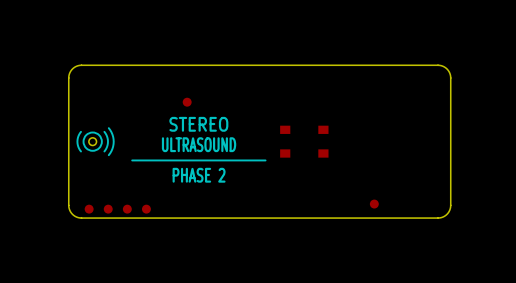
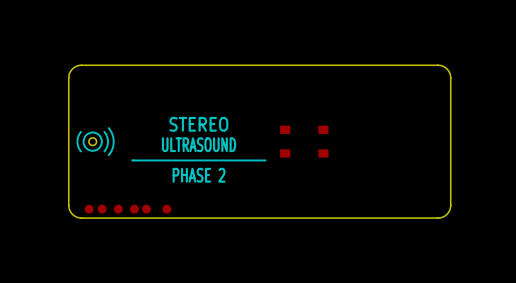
part: (187, 102) -> none
part: (374, 204) -> none
part: none -> (102, 209)
part: (108, 209) -> none
part: none -> (118, 209)
part: (127, 209) -> none
part: none -> (134, 209)
part: none -> (166, 209)

